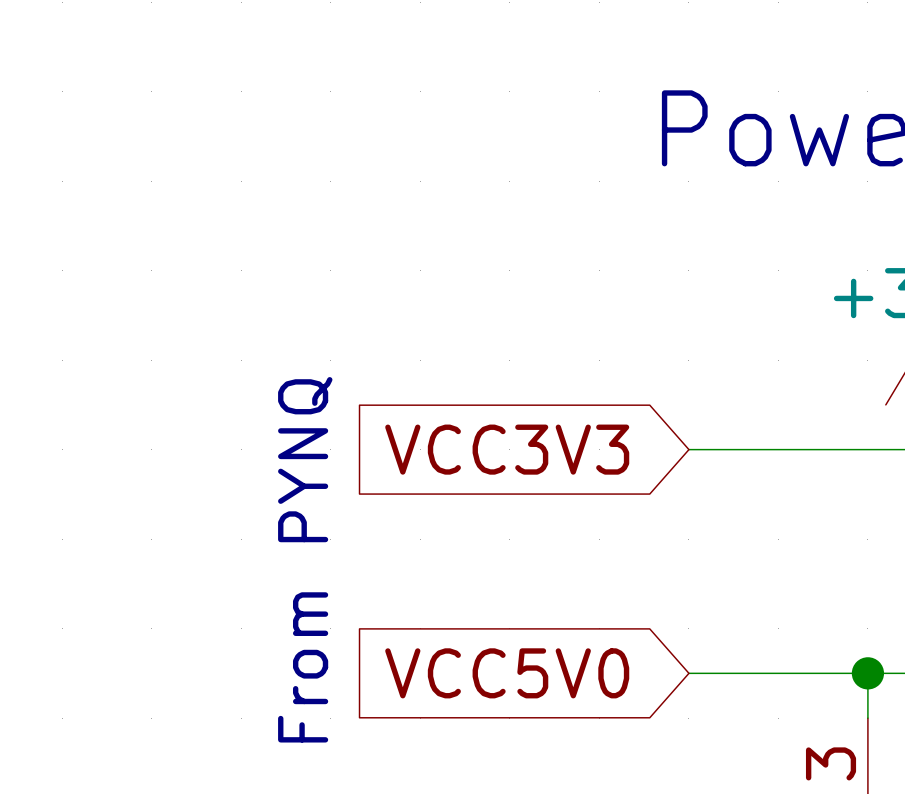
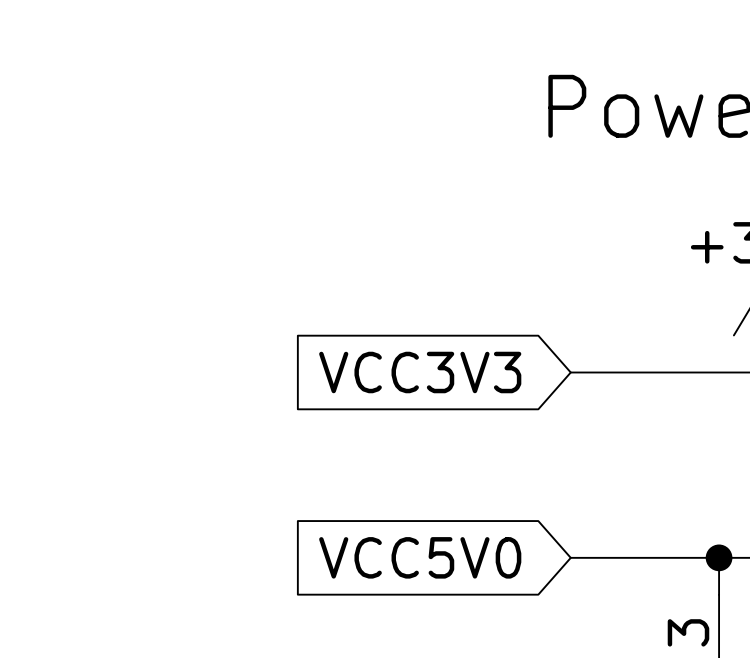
text: From PYNQ (305, 559) -> none

